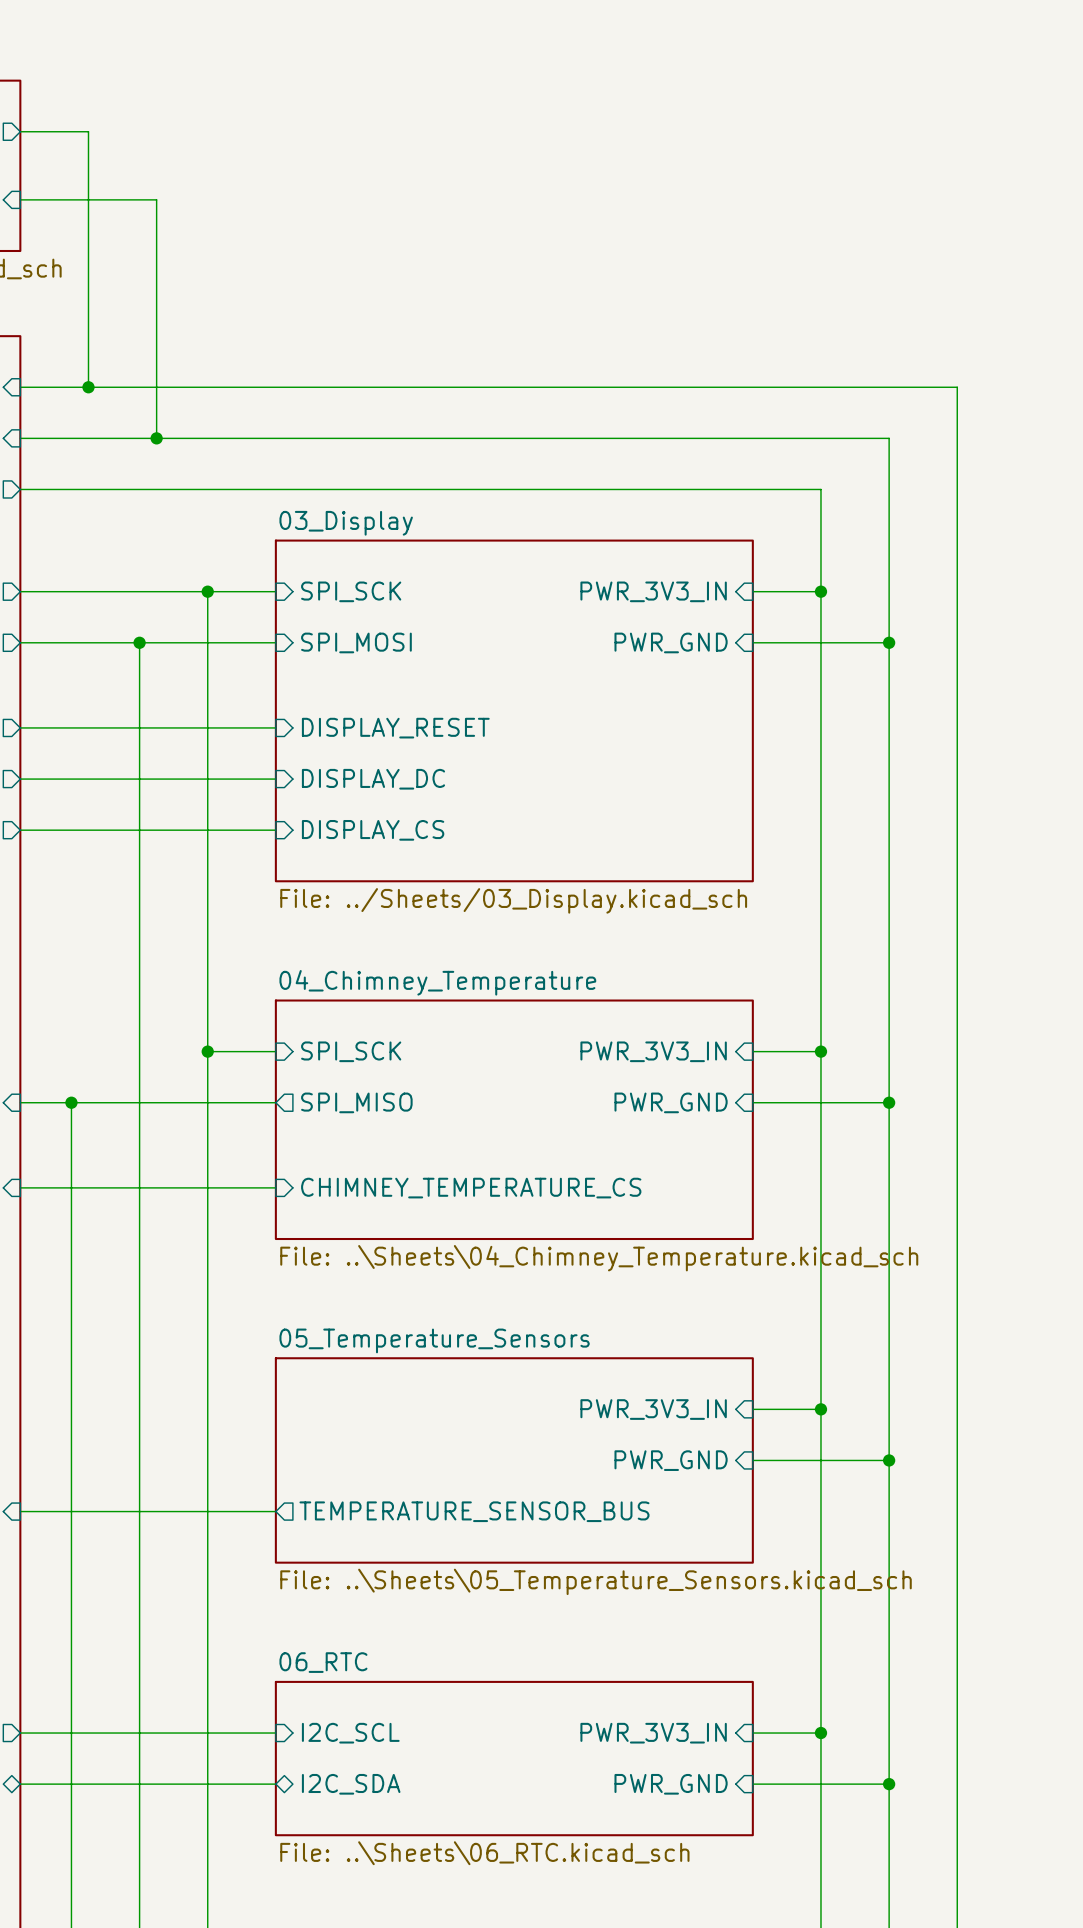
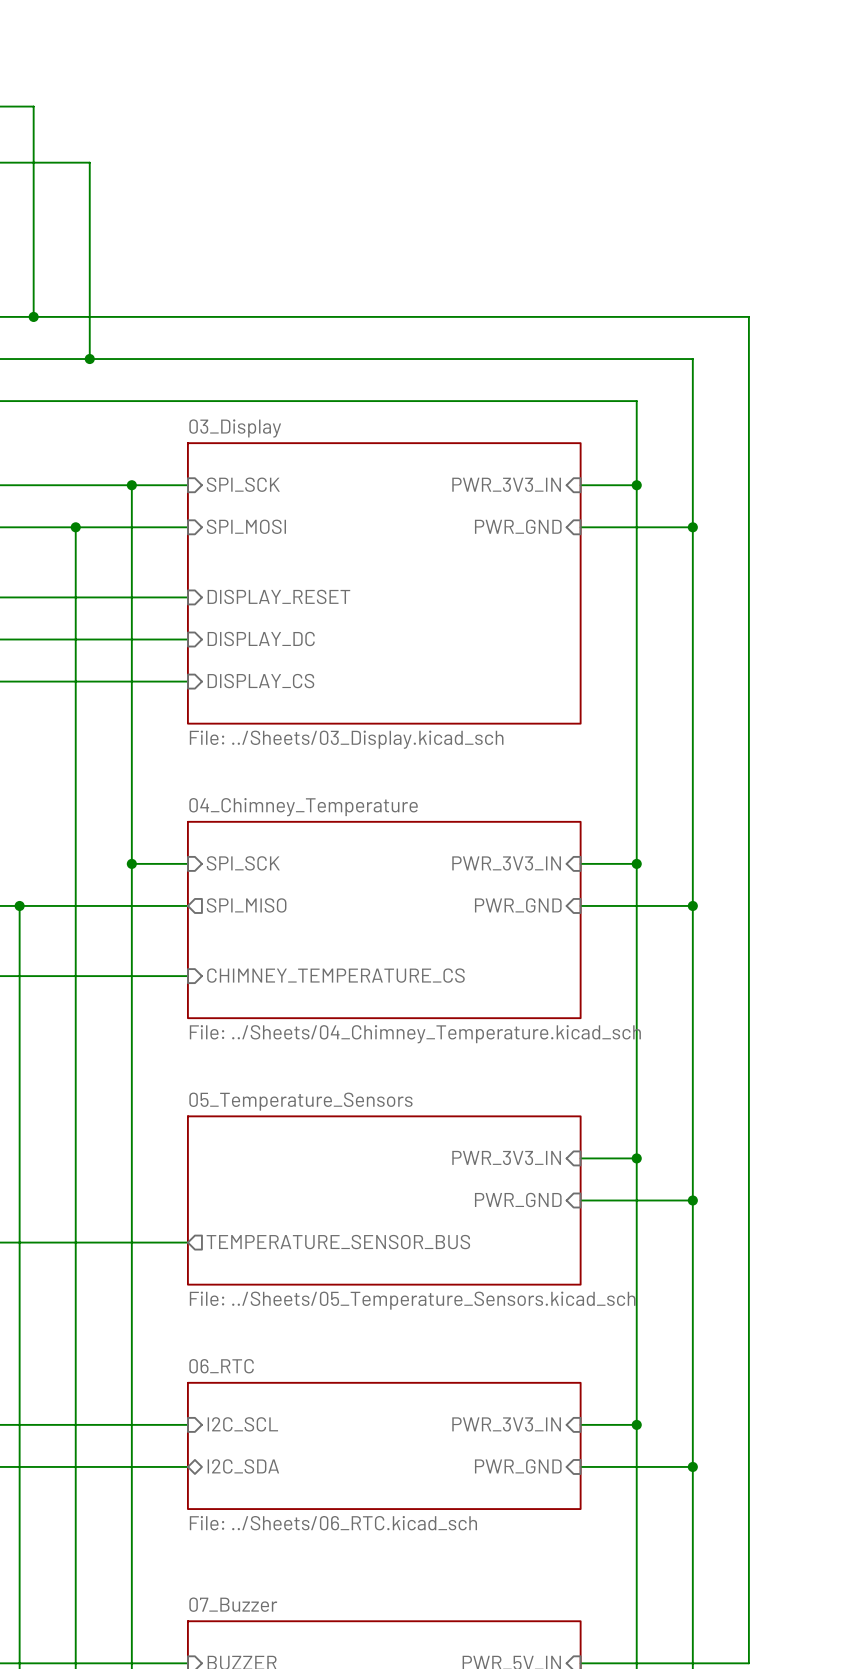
sheet 04_Chimney_Temperature value: File: ..\Sheets\04_Chimney_Temperature.kicad_sch (599, 1258) -> File: ../Sheets/04_Chimney_Temperature.kicad_sch (415, 1034)
sheet 05_Temperature_Sensors value: File: ..\Sheets\05_Temperature_Sensors.kicad_sch (596, 1581) -> File: ../Sheets/05_Temperature_Sensors.kicad_sch (412, 1300)
sheet 06_RTC value: File: ..\Sheets\06_RTC.kicad_sch (484, 1853) -> File: ../Sheets/06_RTC.kicad_sch (333, 1523)

